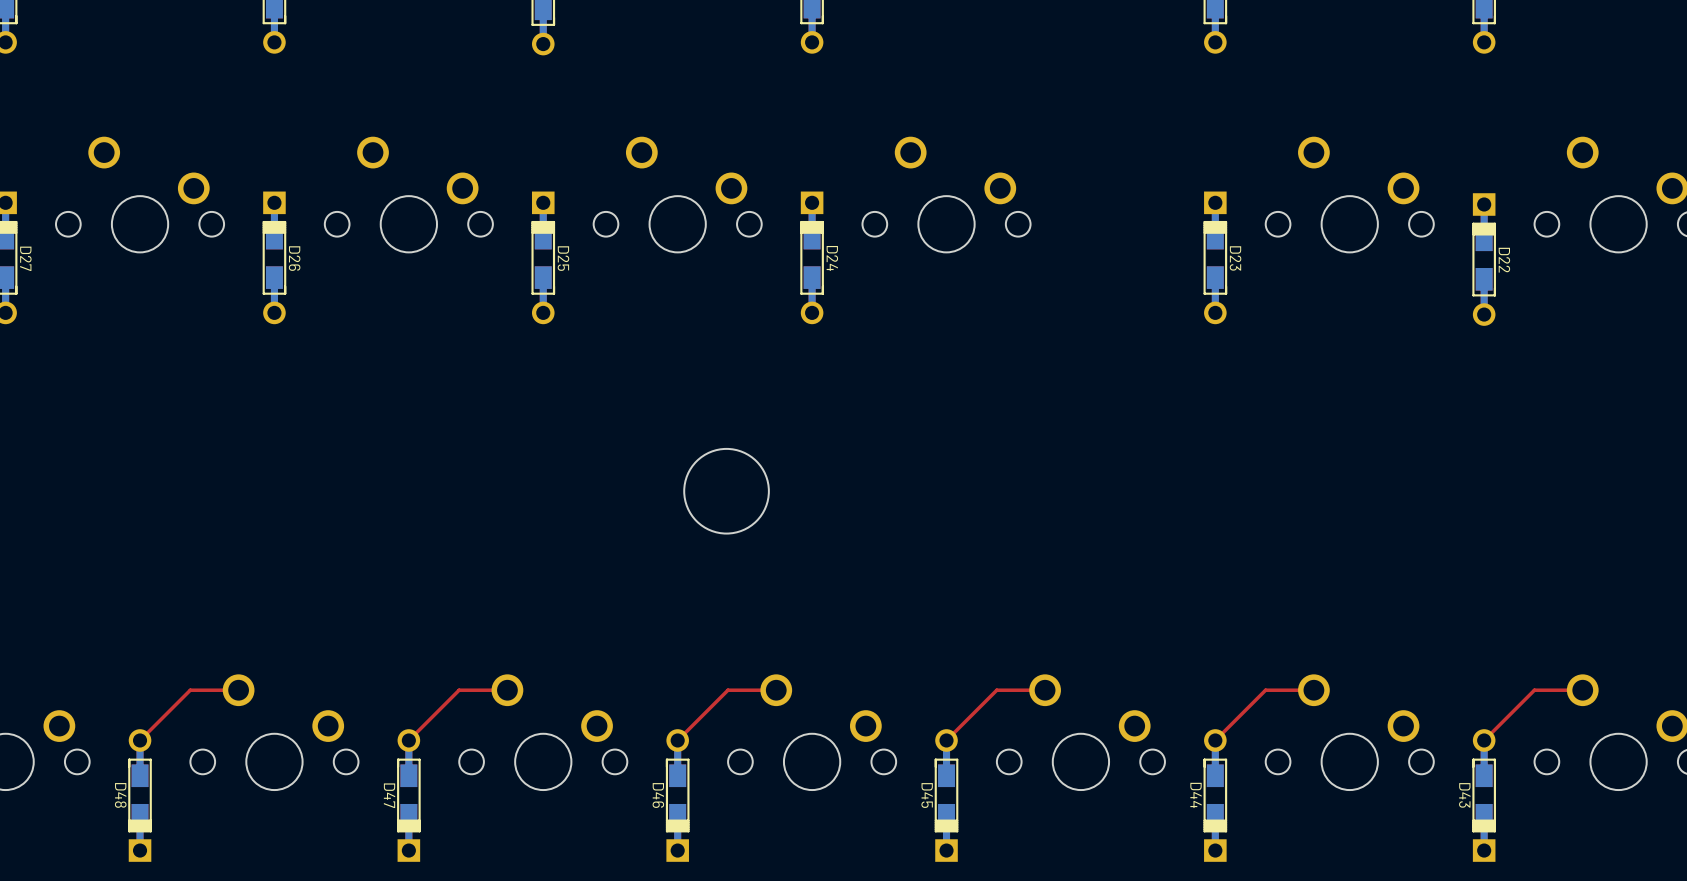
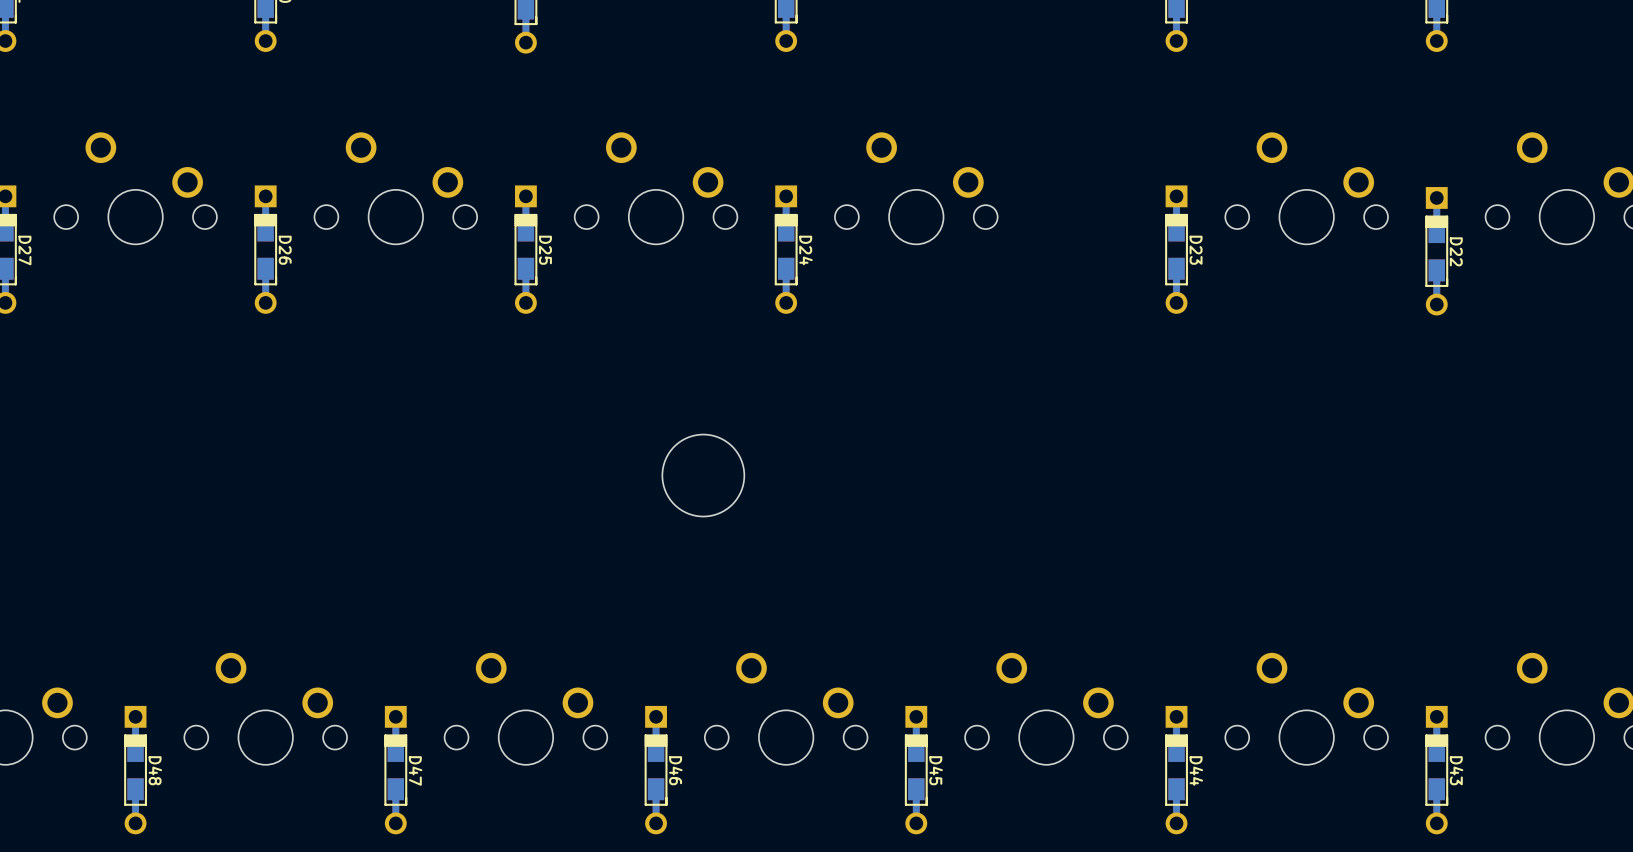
top track: (238, 690) (190, 690) (140, 740) -> none
top track: (507, 690) (459, 690) (408, 740) -> none
top track: (776, 690) (727, 690) (677, 740) -> none
top track: (1045, 690) (996, 690) (946, 740) -> none
top track: (1313, 690) (1265, 690) (1215, 740) -> none
top track: (1582, 690) (1534, 690) (1484, 740) -> none
D48 rotation: 0° (140, 795) -> 180° (135, 770)
D47 rotation: 0° (408, 795) -> 180° (395, 770)
D46 rotation: 0° (677, 795) -> 180° (656, 770)
D45 rotation: 0° (946, 795) -> 180° (916, 770)
D44 rotation: 0° (1215, 795) -> 180° (1176, 770)
D43 rotation: 0° (1484, 795) -> 180° (1436, 770)

